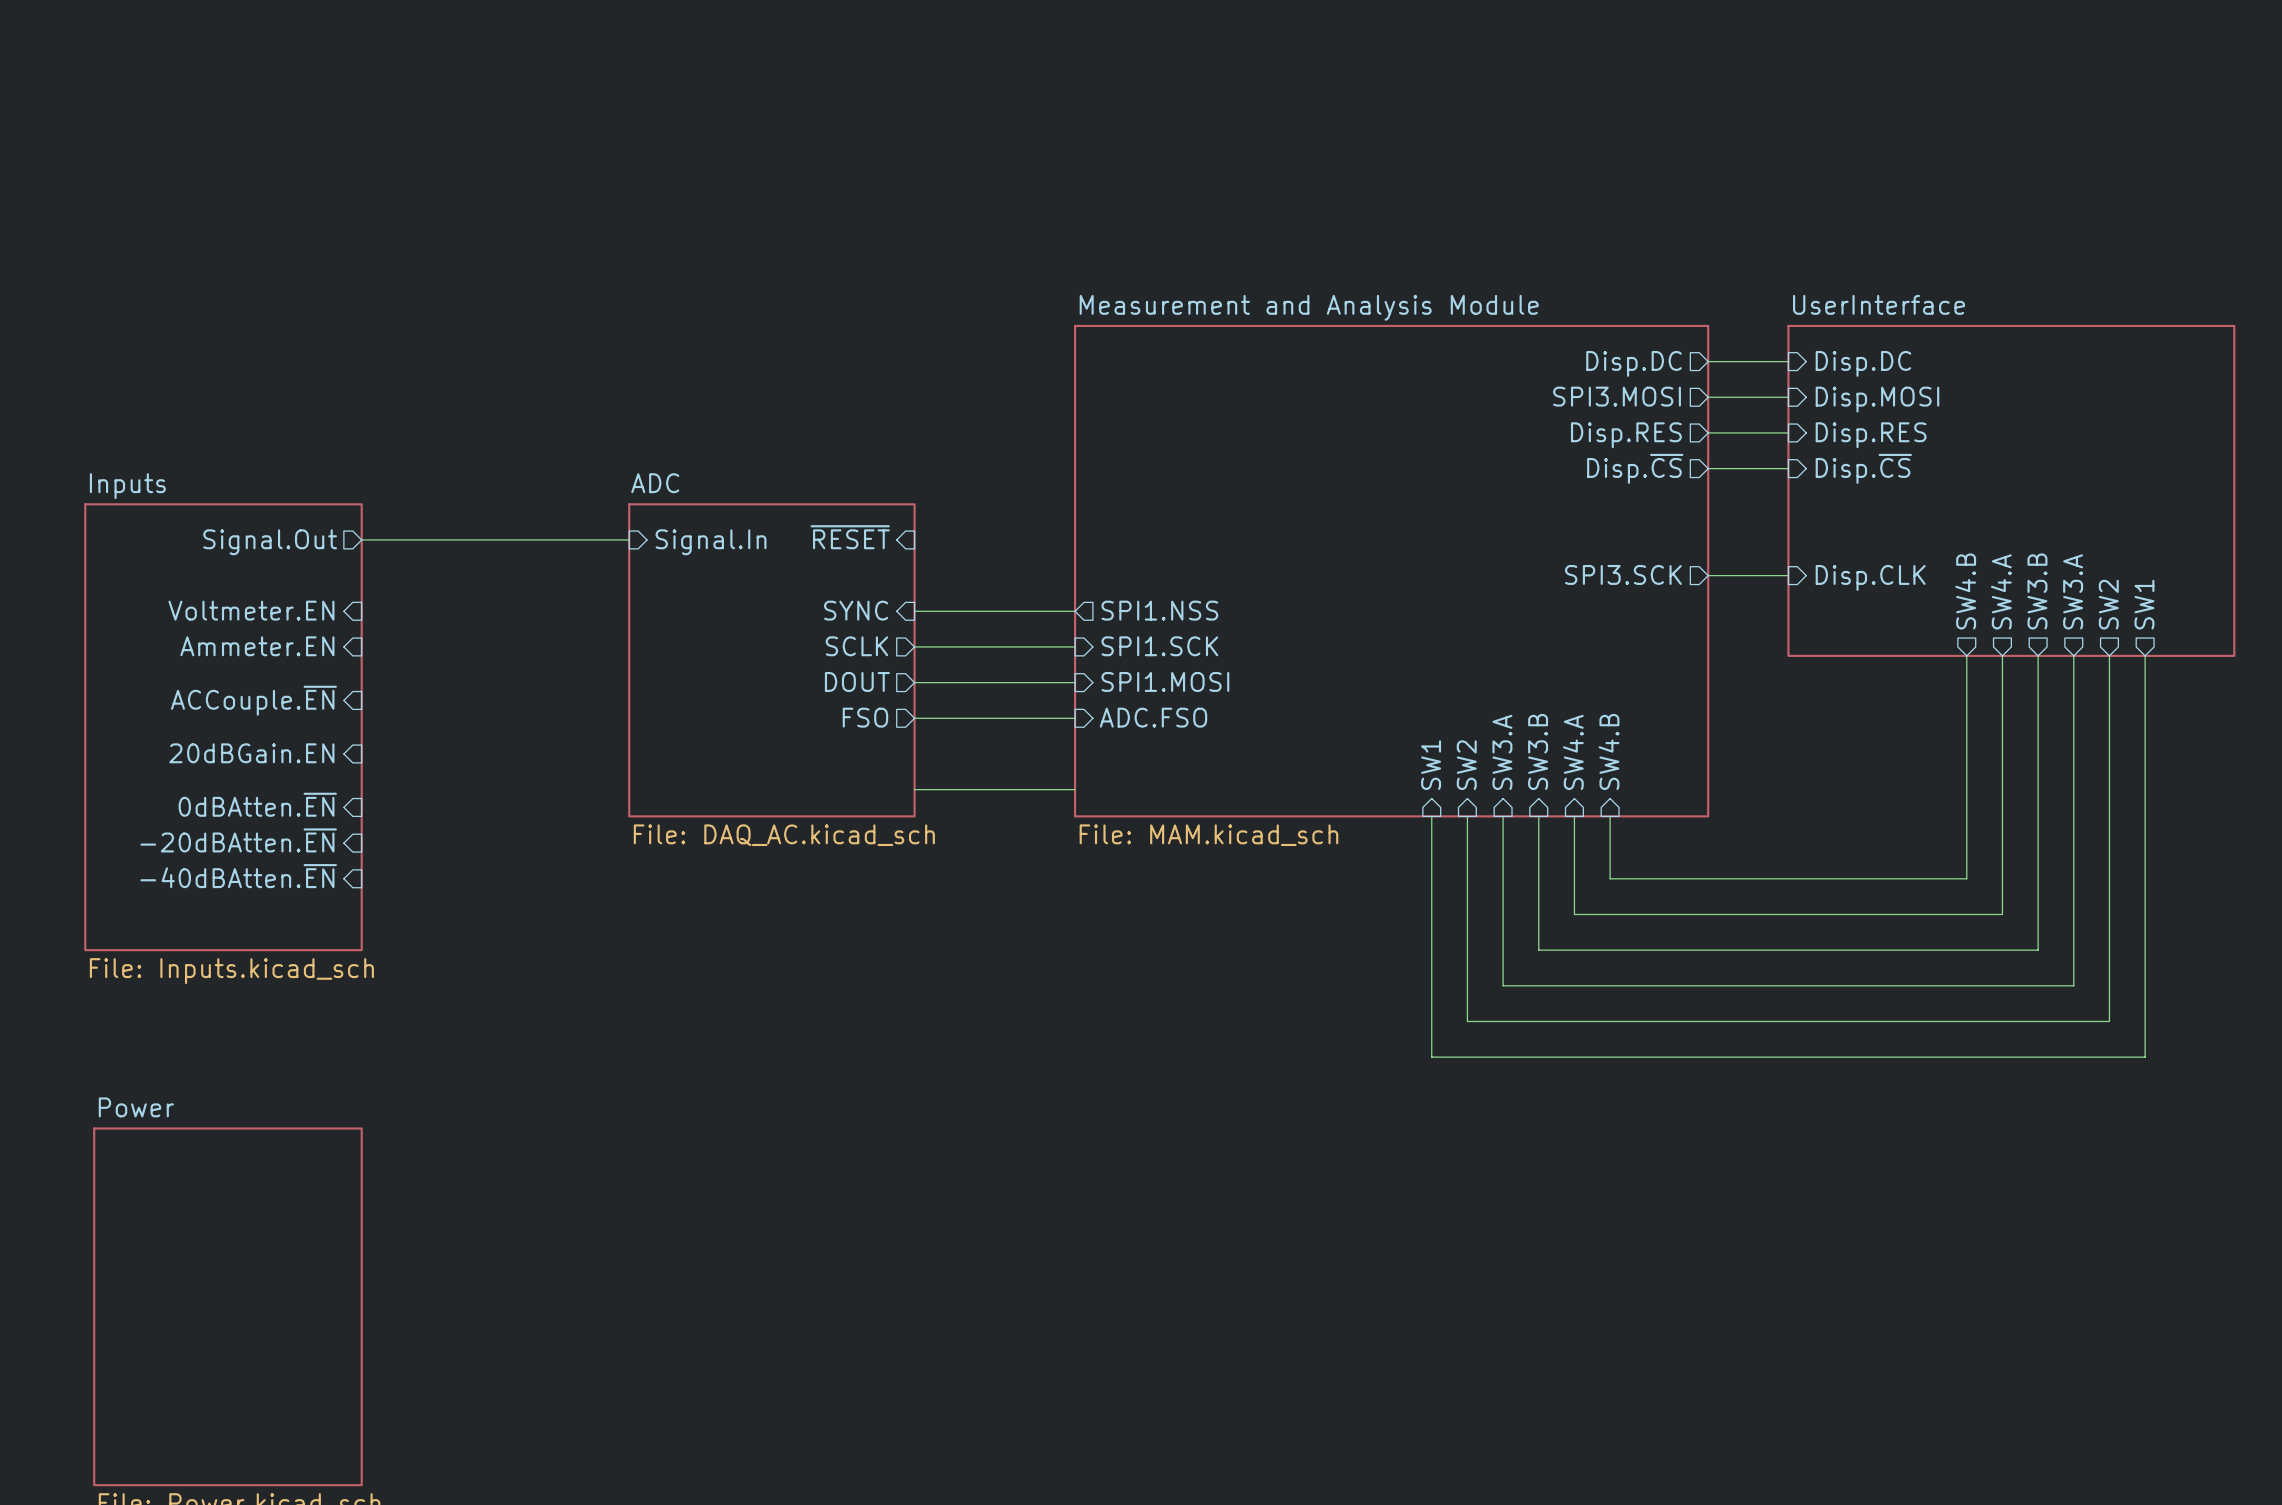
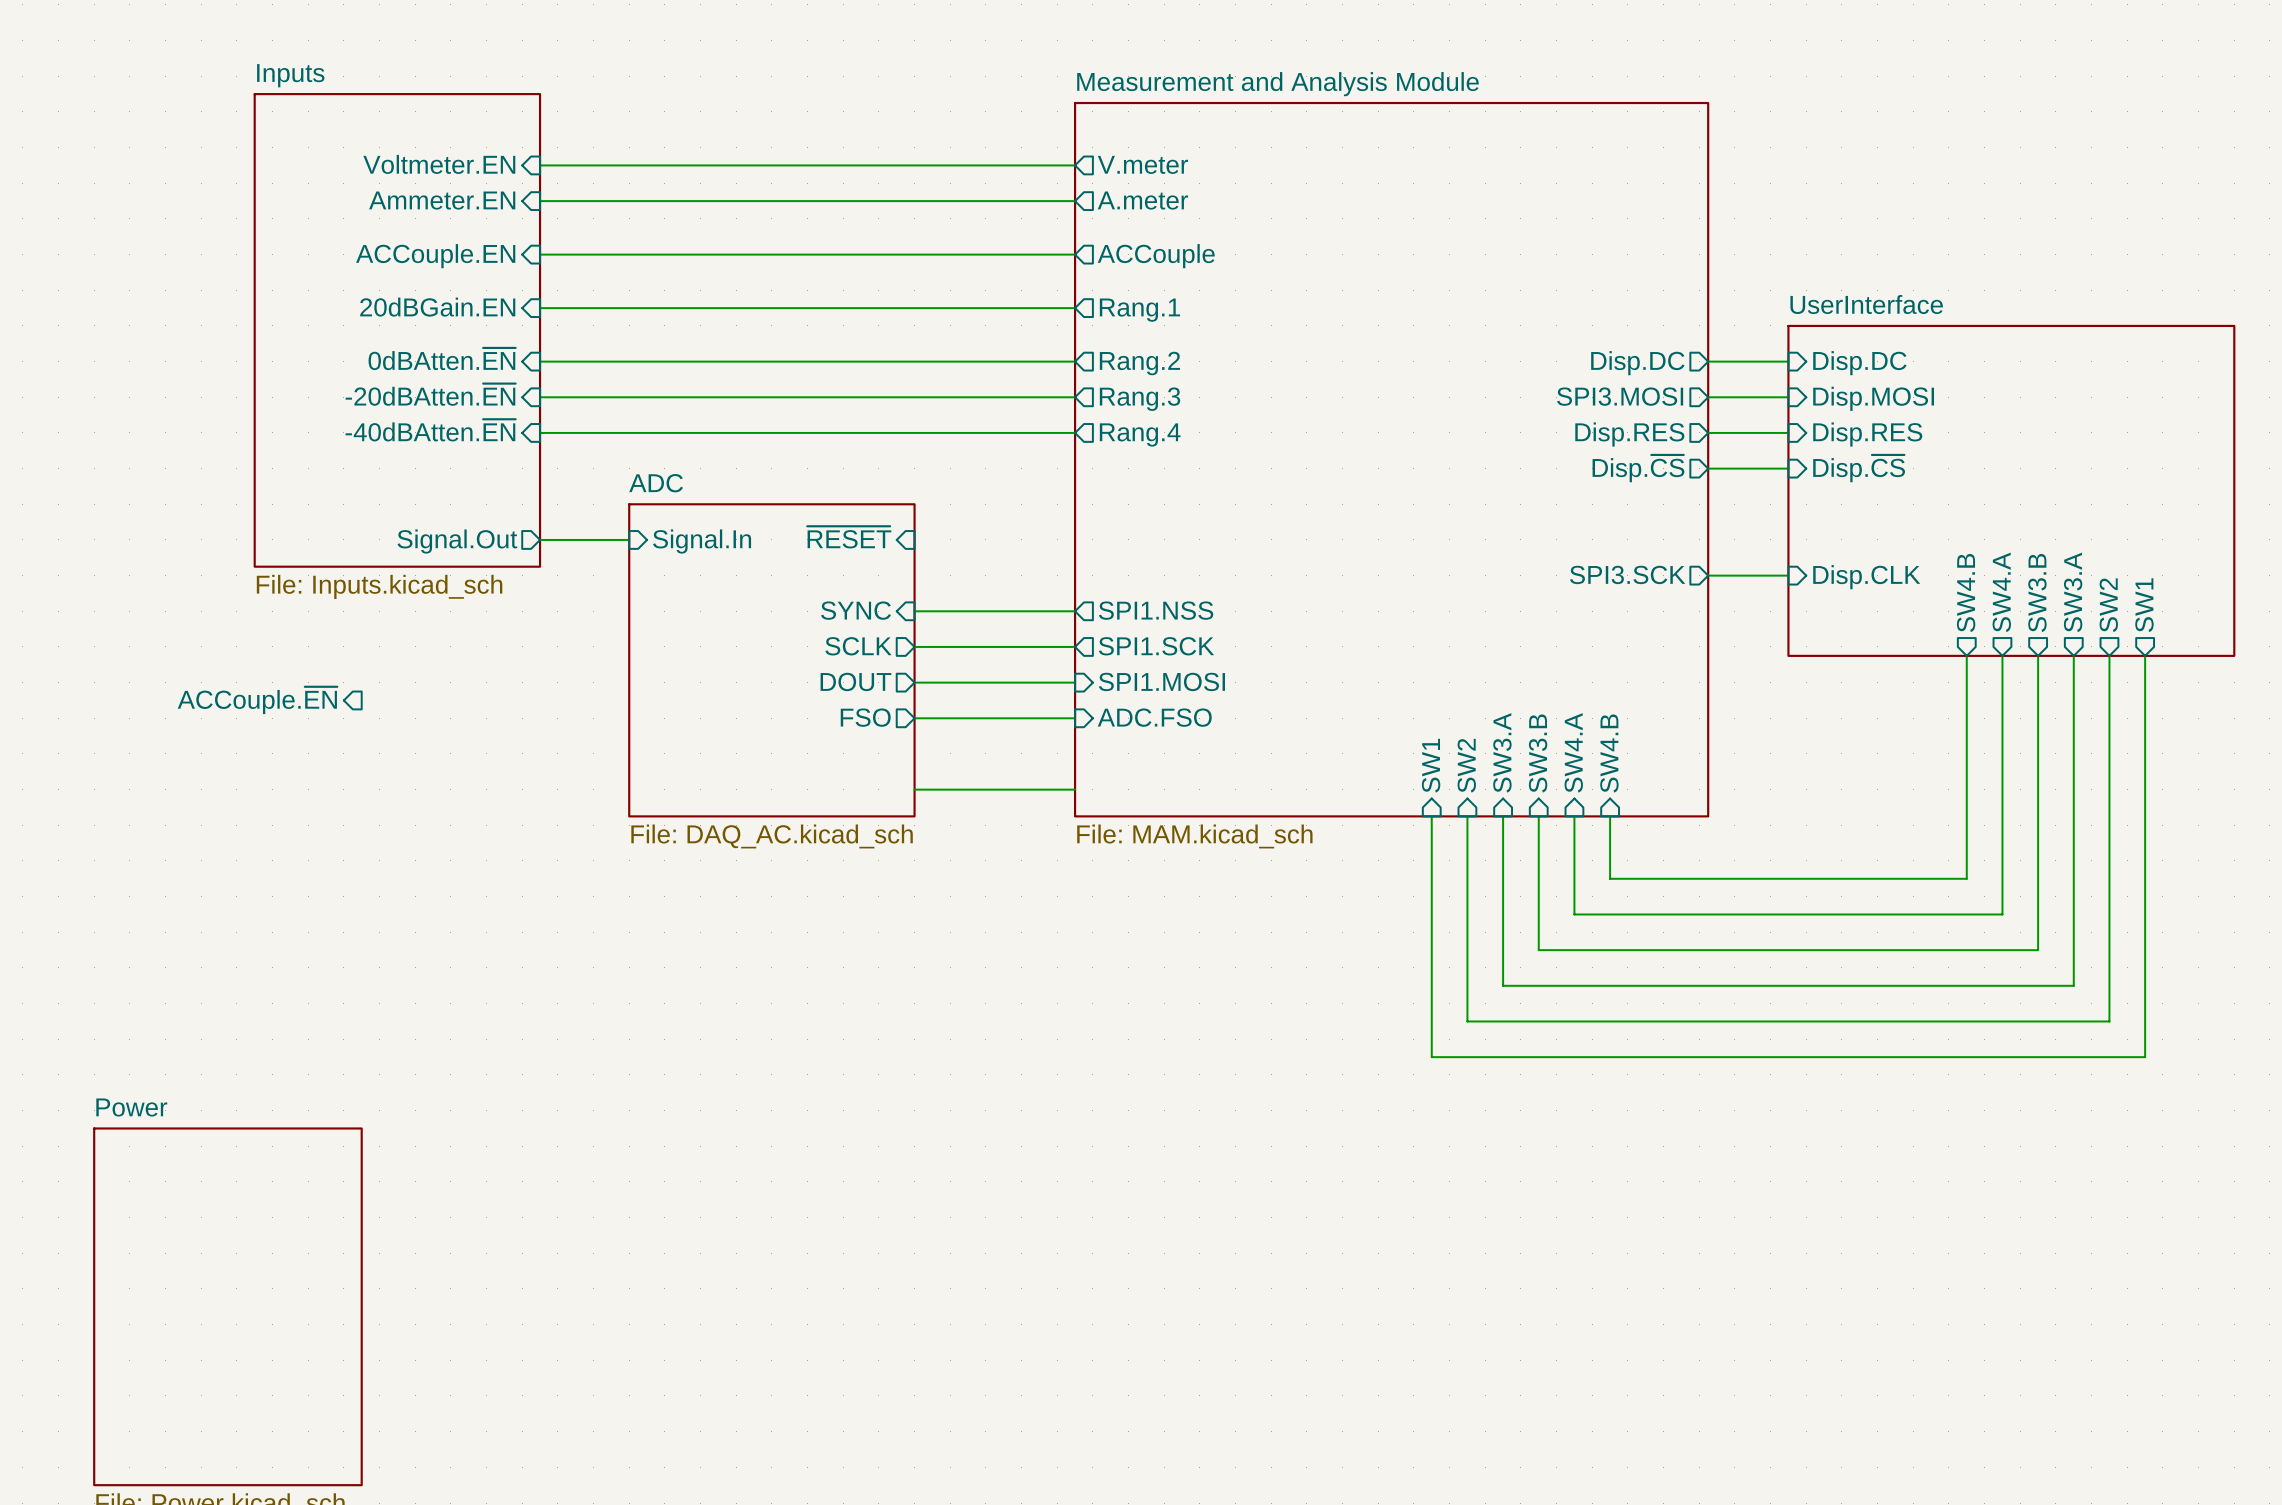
sheet pin: none -> Voltmeter.EN (439, 164)
sheet pin: none -> V.meter (1142, 164)
wire: none -> (540, 165) (1075, 165)
sheet pin: none -> Ammeter.EN (442, 200)
sheet pin: none -> A.meter (1142, 200)
wire: none -> (540, 201) (1075, 201)
wire: none -> (540, 254) (1075, 254)
sheet pin: none -> ACCouple.EN (435, 256)
sheet pin: none -> ACCouple (1156, 256)
sheet pin: none -> 20dBGain.EN (437, 307)
wire: none -> (540, 308) (1075, 308)
sheet pin: none -> Rang.1 (1139, 310)
sheet Inputs: none -> File: Inputs.kicad_sch (397, 330)
sheet pin: none -> 0dBAtten.~{EN} (442, 359)
wire: none -> (540, 361) (1075, 361)
sheet pin: none -> Rang.2 (1139, 363)
sheet pin: none -> -20dBAtten.~{EN} (430, 394)
wire: none -> (540, 397) (1075, 397)
sheet pin: none -> Rang.3 (1140, 399)
sheet pin: none -> -40dBAtten.~{EN} (430, 430)
wire: none -> (540, 432) (1075, 432)
sheet pin: none -> Rang.4 (1140, 434)
sheet Measurement and Analysis Module: none -> File: MAM.kicad_sch (1391, 459)
wire: (361, 539) (540, 539) -> none
sheet pin position: Signal.Out (270, 542) -> Signal.Out (457, 541)
sheet Measurement and Analysis Module: File: MAM.kicad_sch (1391, 571) -> none
sheet pin: Voltmeter.EN (251, 610) -> none
sheet pin: Ammeter.EN (257, 646) -> none
sheet pin shape: input (1159, 646) -> output (1156, 646)
sheet Inputs: File: Inputs.kicad_sch (223, 727) -> none
sheet pin: 20dBGain.EN (251, 753) -> none
sheet pin: 0dBAtten.~{EN} (257, 804) -> none
sheet pin: -20dBAtten.~{EN} (238, 840) -> none
sheet pin: -40dBAtten.~{EN} (238, 876) -> none

